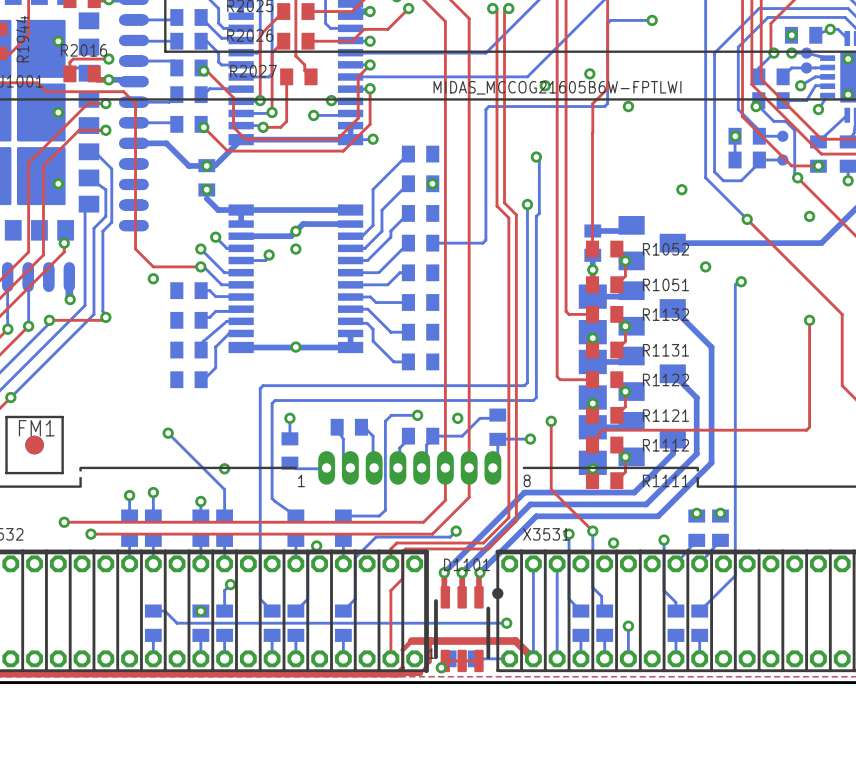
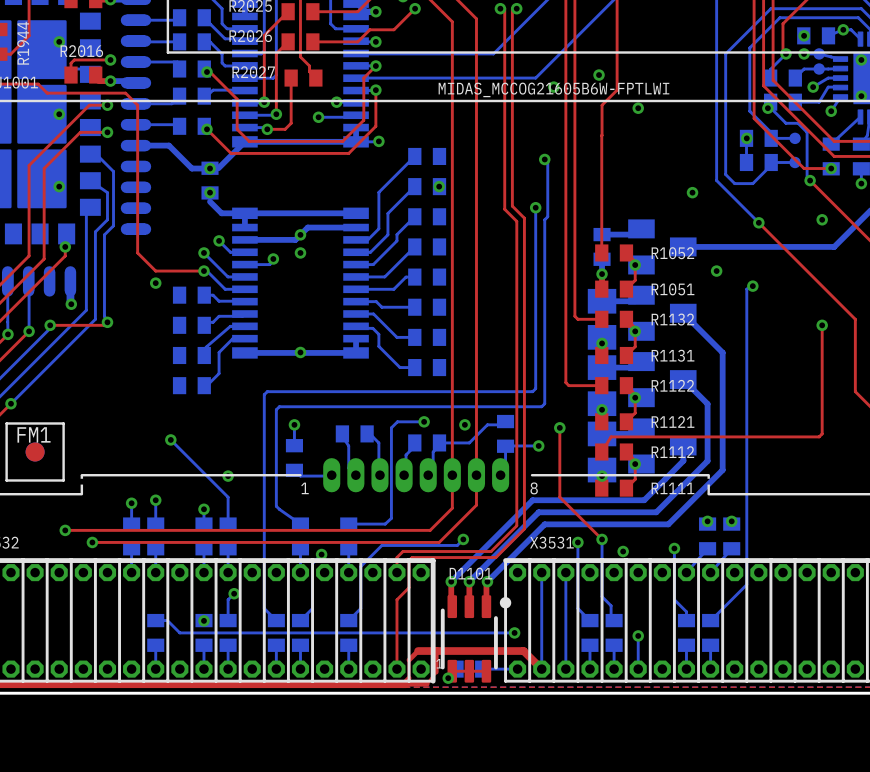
bottom track: (652, 20) (610, 20) (607, 23) (607, 103) (604, 106) (488, 106) (485, 109) (485, 240) (482, 243) (432, 243) -> none
via: (652, 20) -> none

